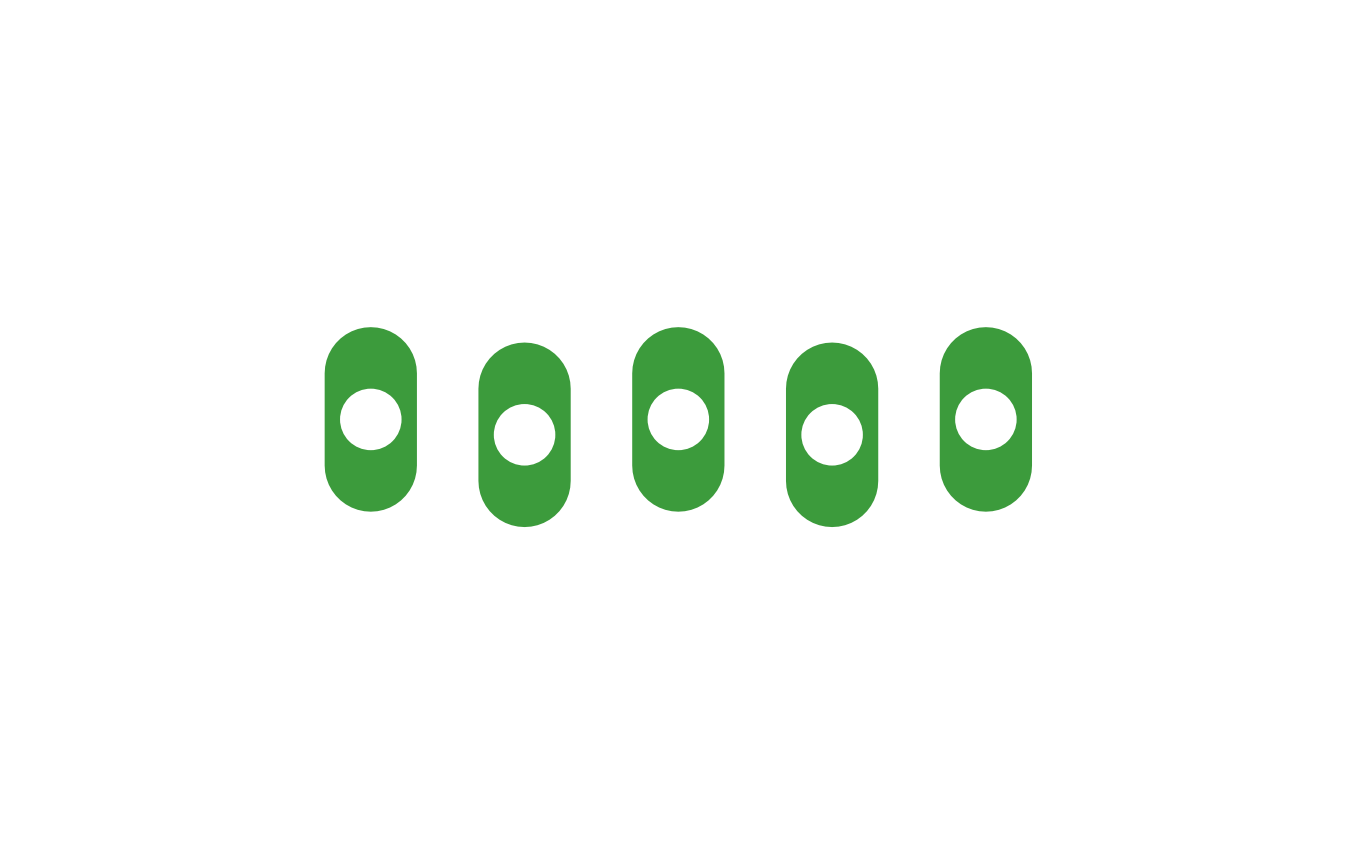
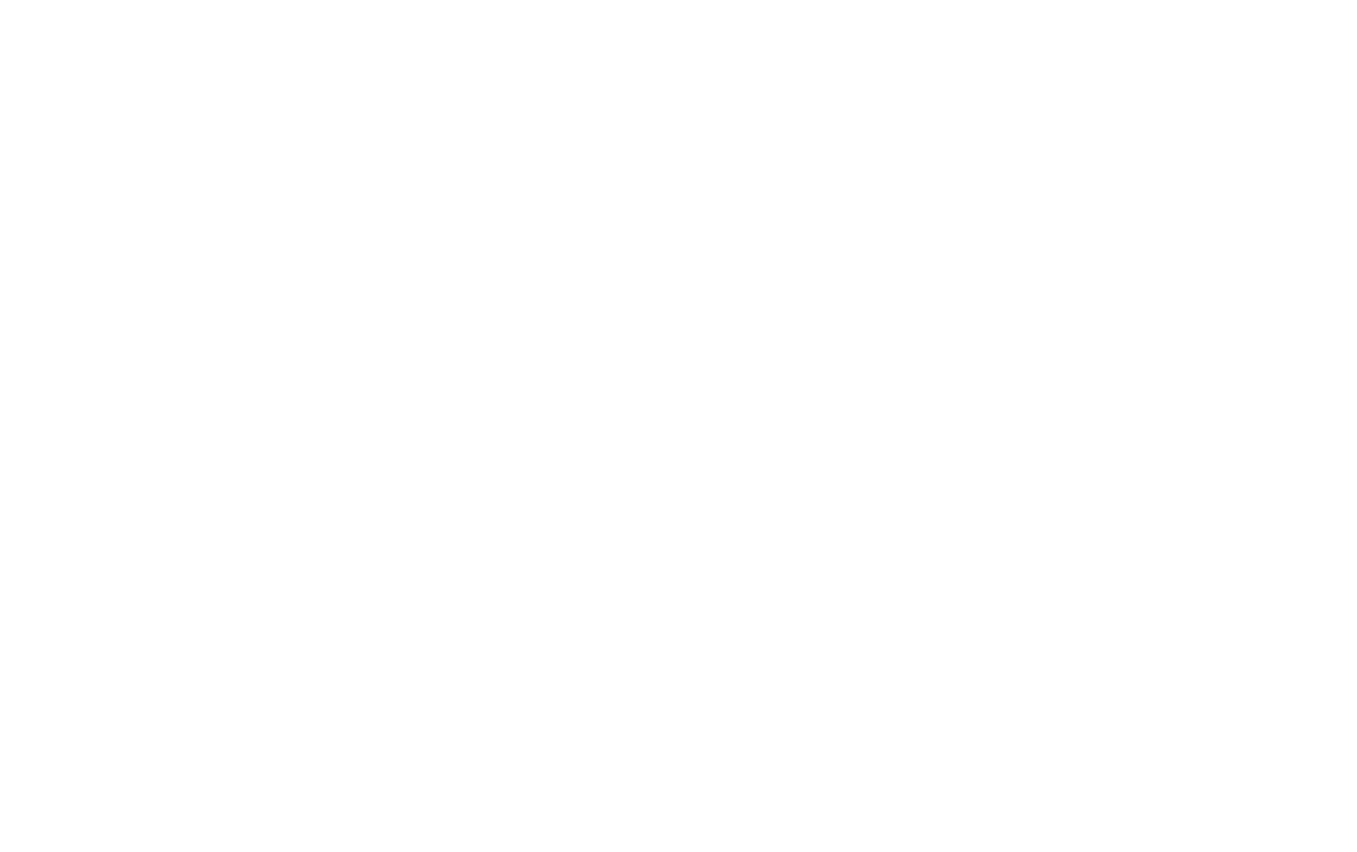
part: (678, 427) -> none

